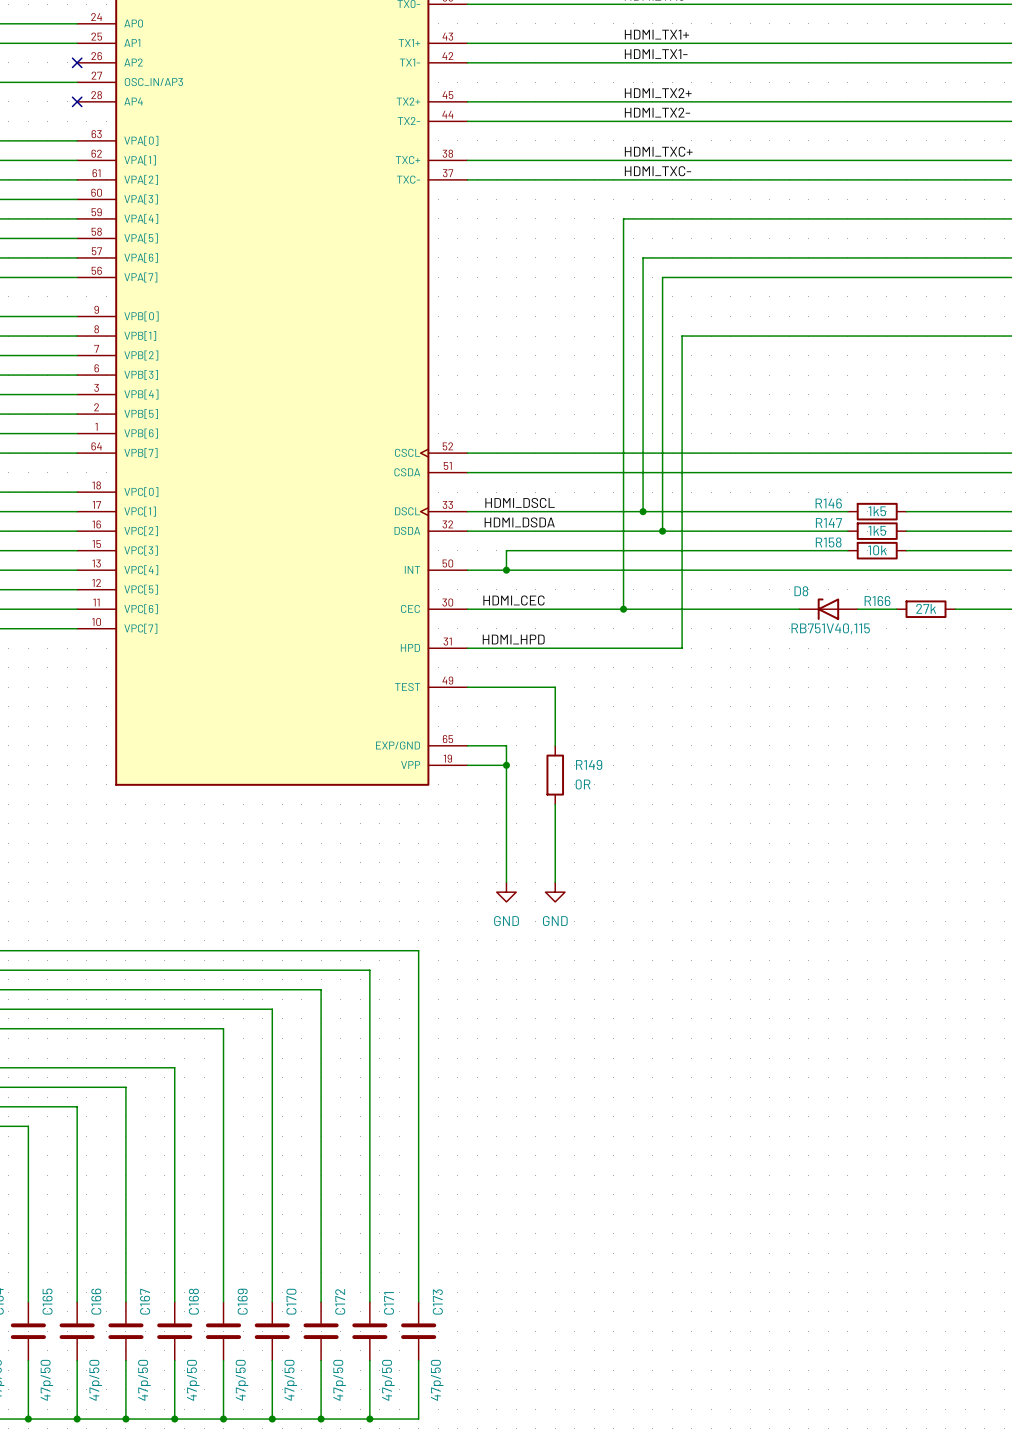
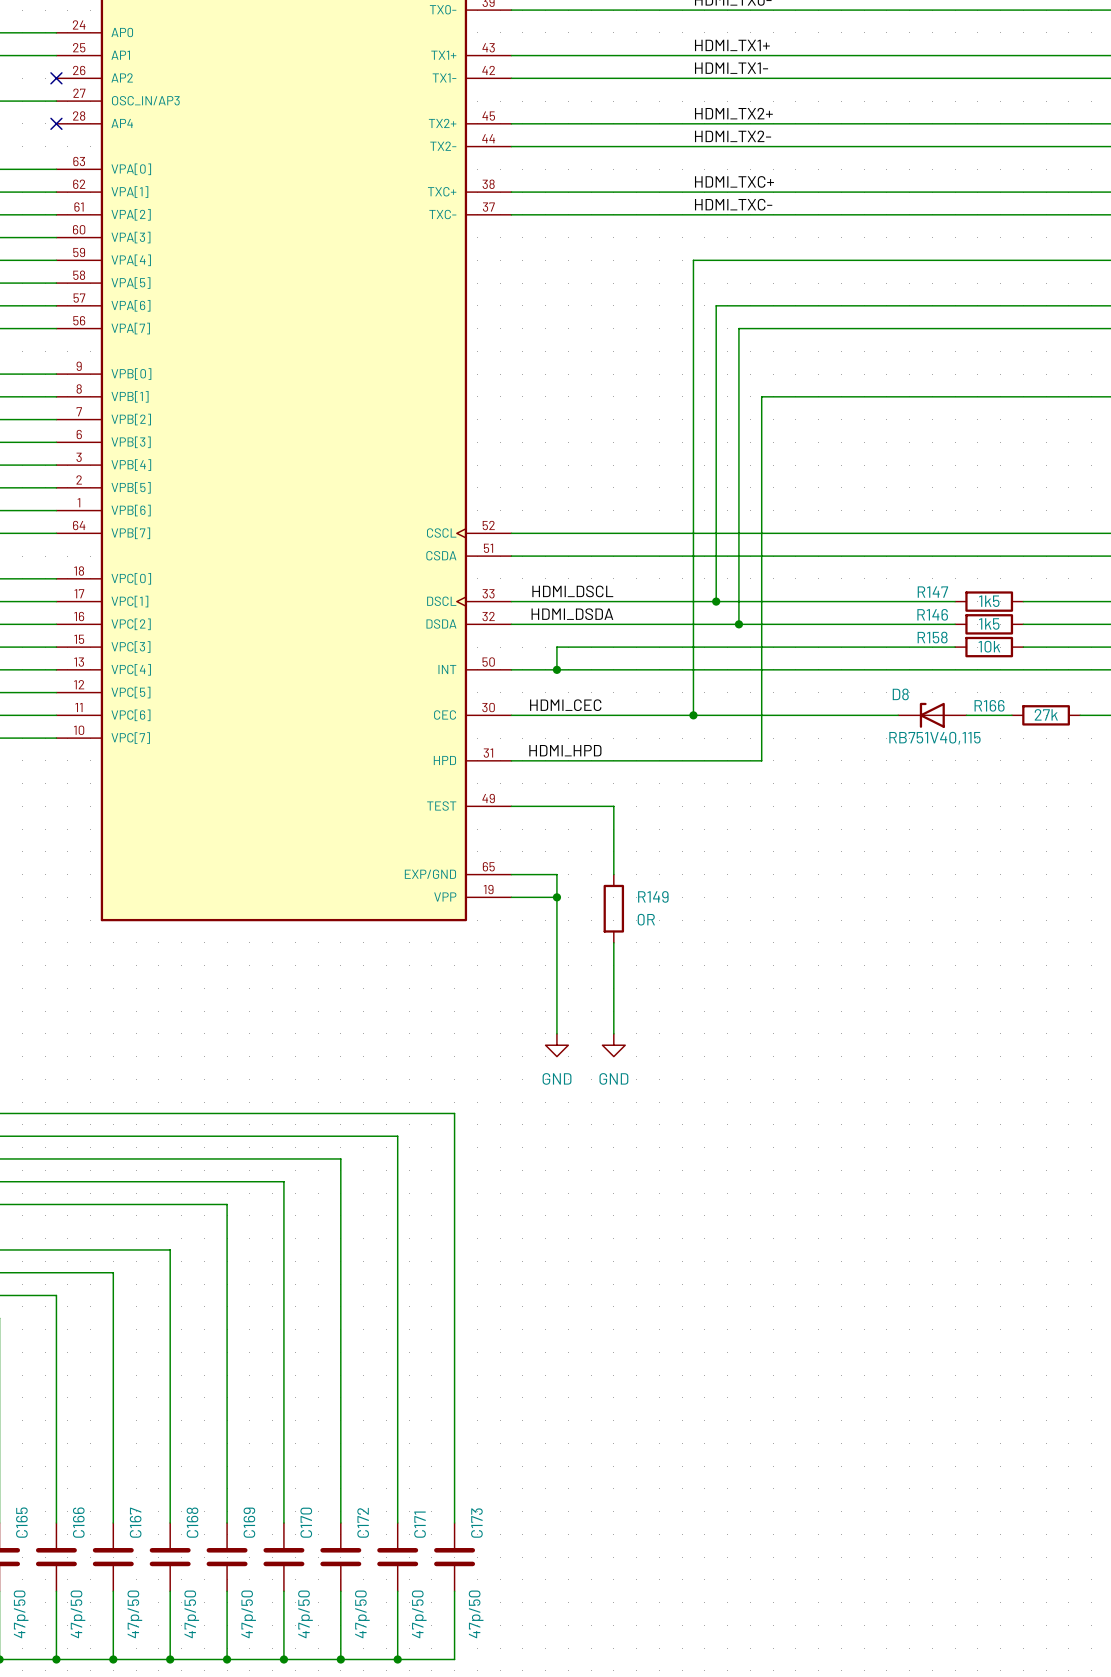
R146 name: R146 (828, 503) -> R147 (932, 592)
R147 name: R147 (828, 522) -> R146 (932, 614)

